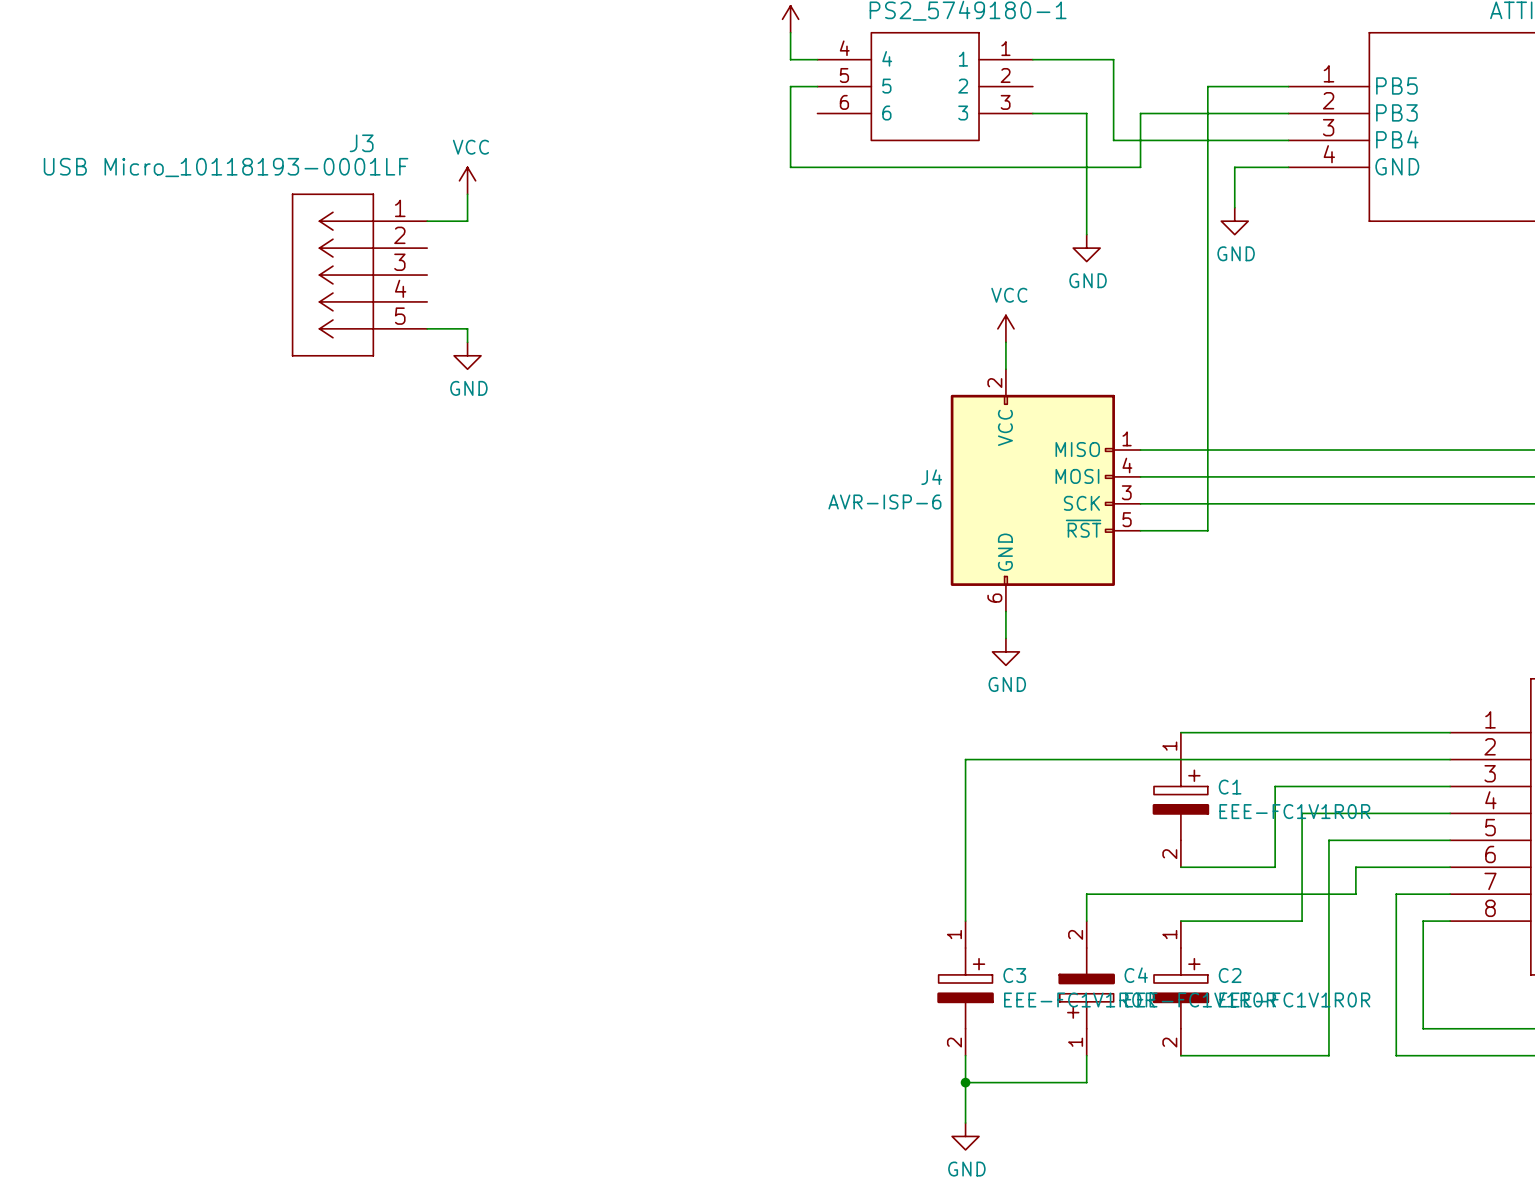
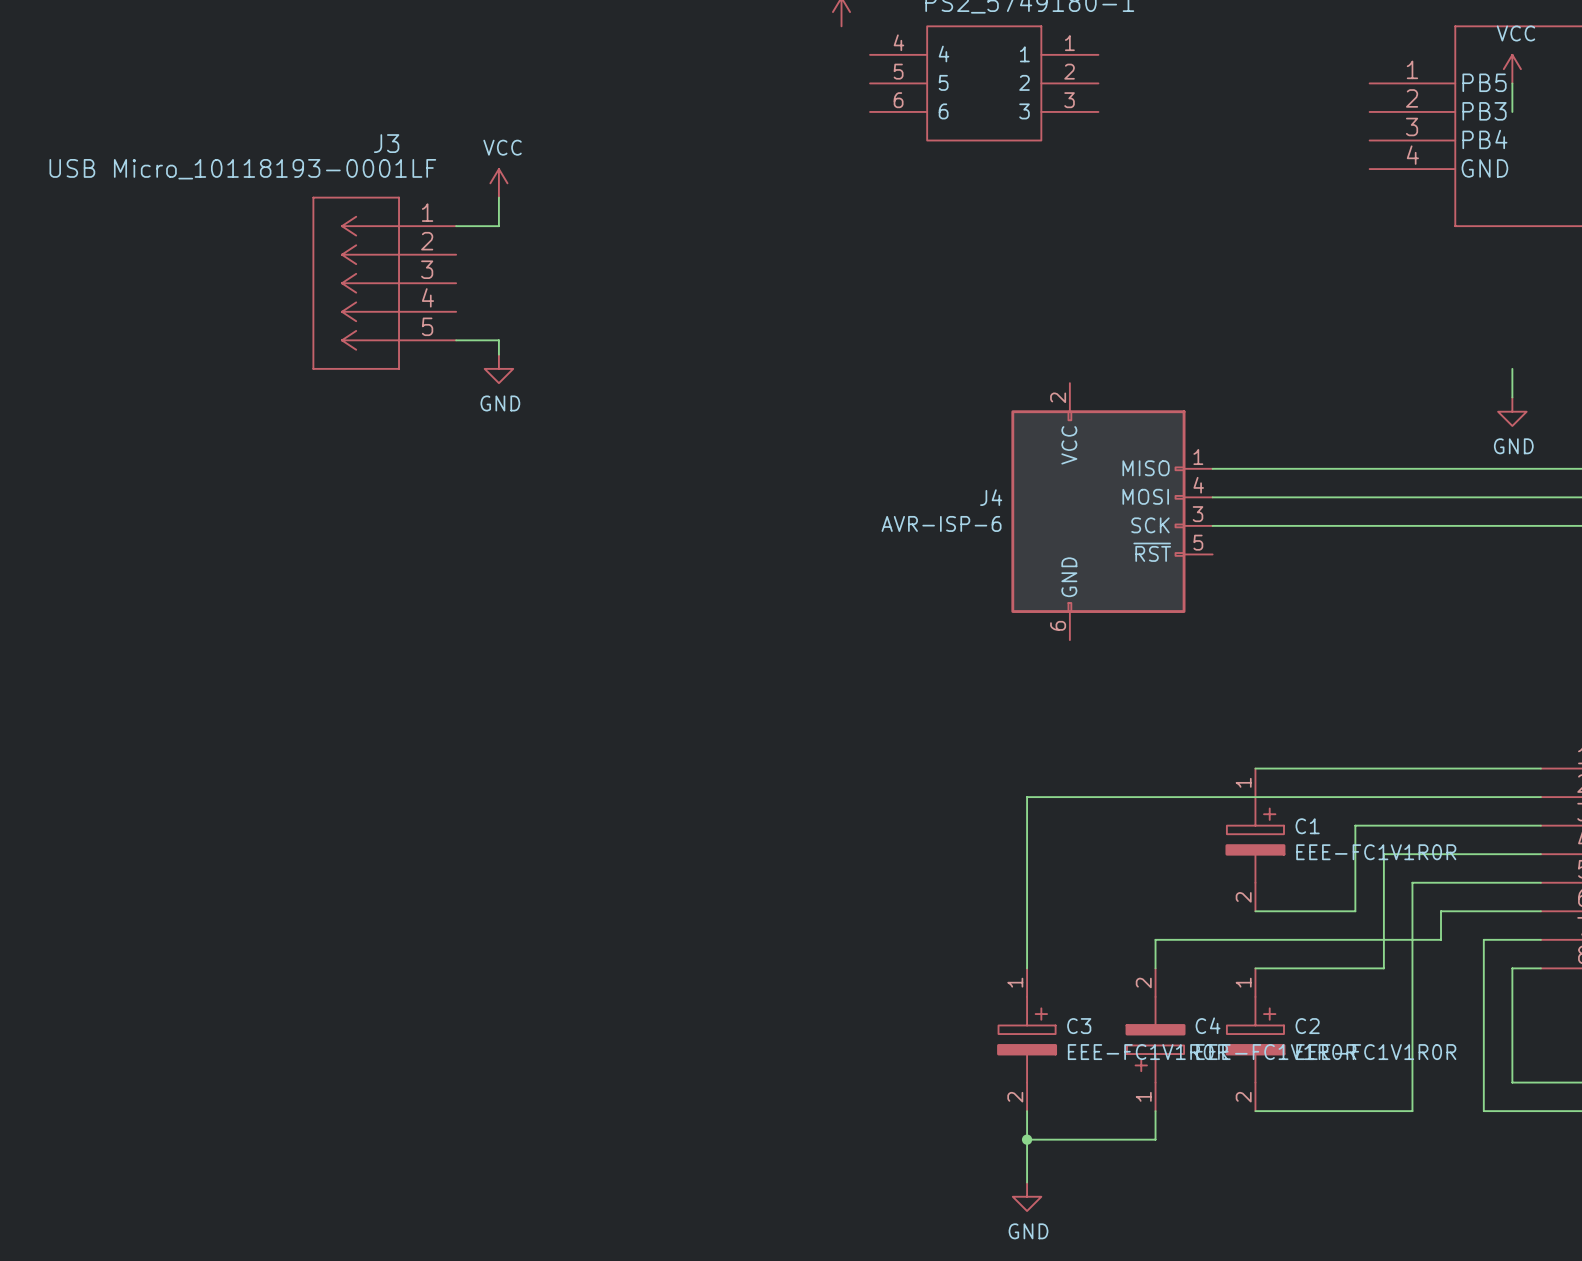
wire: (790, 32) (790, 59) (817, 59) -> none
wire: (1032, 59) (1113, 59) (1113, 140) (1288, 140) -> none
power symbol: none -> VCC (1512, 69)
wire: (817, 86) (790, 86) (790, 167) (1140, 167) (1140, 113) (1288, 113) -> none
wire: (1288, 86) (1207, 86) (1207, 530) (1140, 530) -> none
wire: none -> (1512, 83) (1512, 111)
wire: (1032, 113) (1086, 113) (1086, 234) -> none
wire: (1288, 167) (1234, 167) (1234, 207) -> none
power symbol: GND (1234, 221) -> none
power symbol: GND (1086, 248) -> none
power symbol: VCC (1005, 328) -> none
wire: (1005, 342) (1005, 369) -> none
wire: none -> (1512, 368) (1512, 397)
power symbol: none -> GND (1512, 411)
wire: (1005, 611) (1005, 638) -> none
power symbol: GND (1005, 651) -> none

